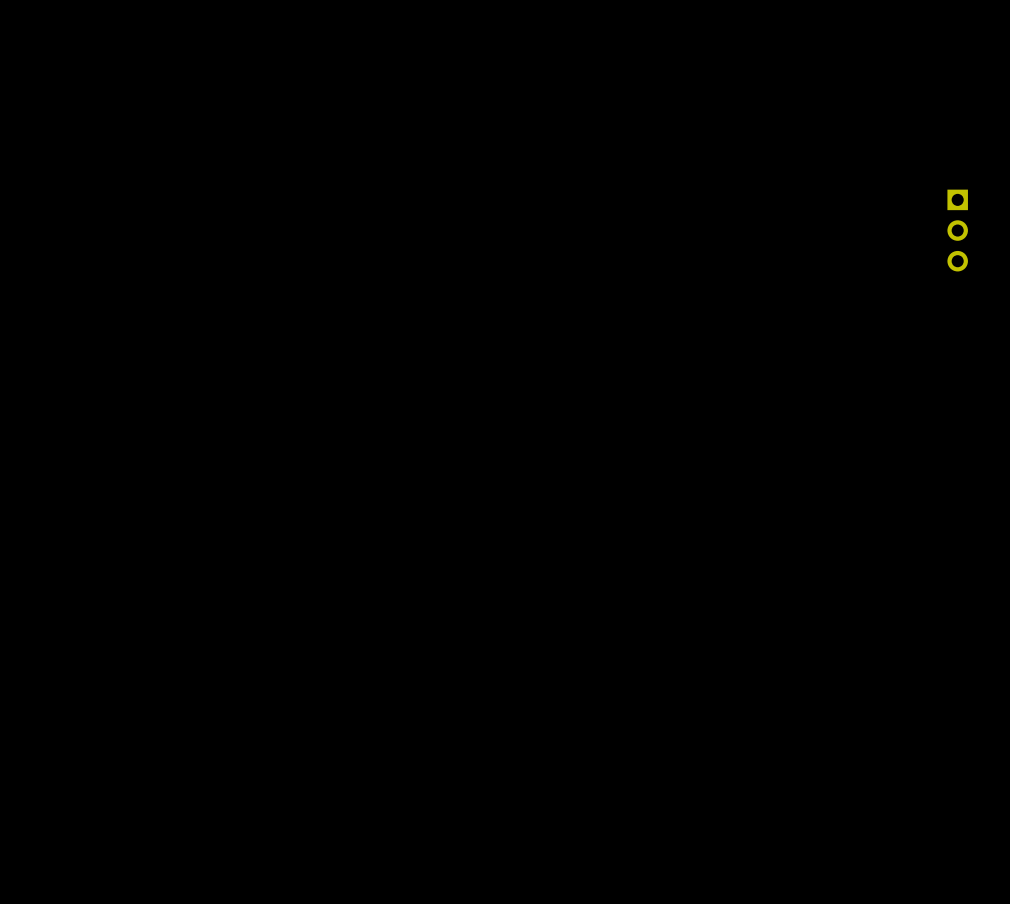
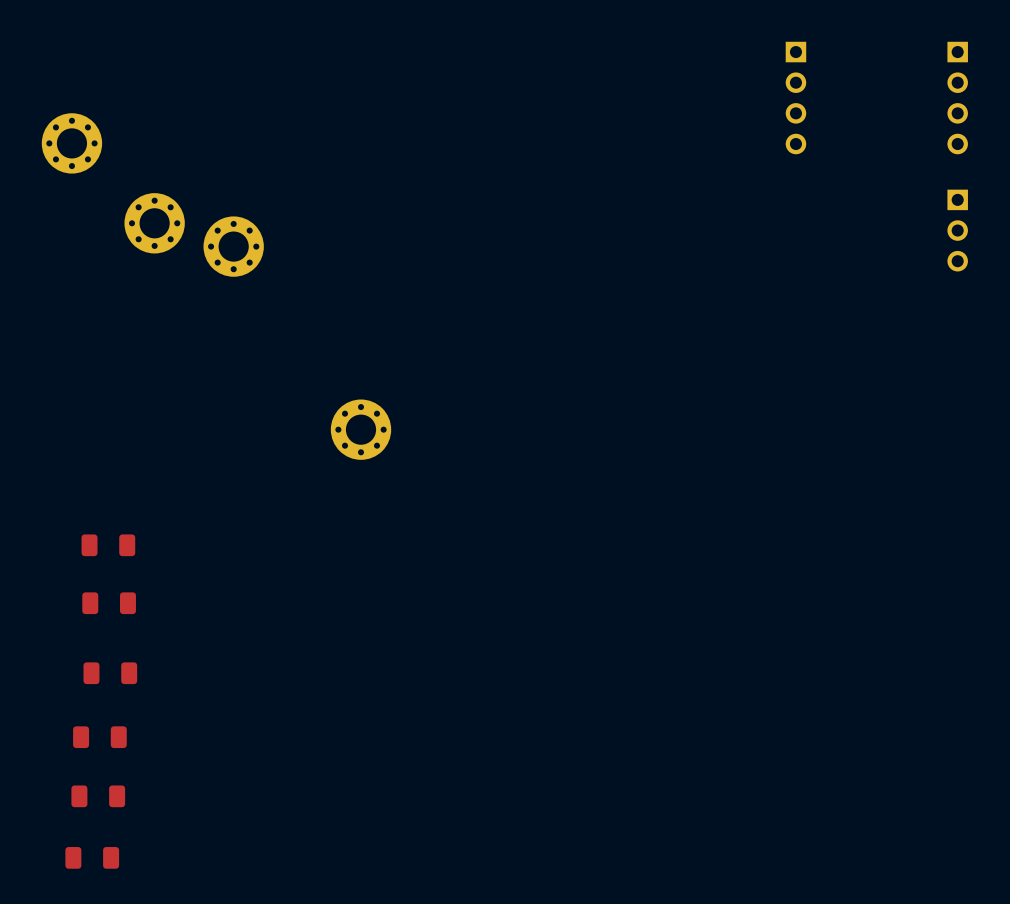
part: none -> (795, 98)
part: none -> (957, 98)
part: none -> (71, 143)
part: none -> (154, 223)
part: none -> (233, 246)
part: none -> (361, 429)
part: none -> (108, 545)
part: none -> (109, 603)
part: none -> (110, 673)
part: none -> (99, 737)
part: none -> (98, 796)
part: none -> (92, 857)

